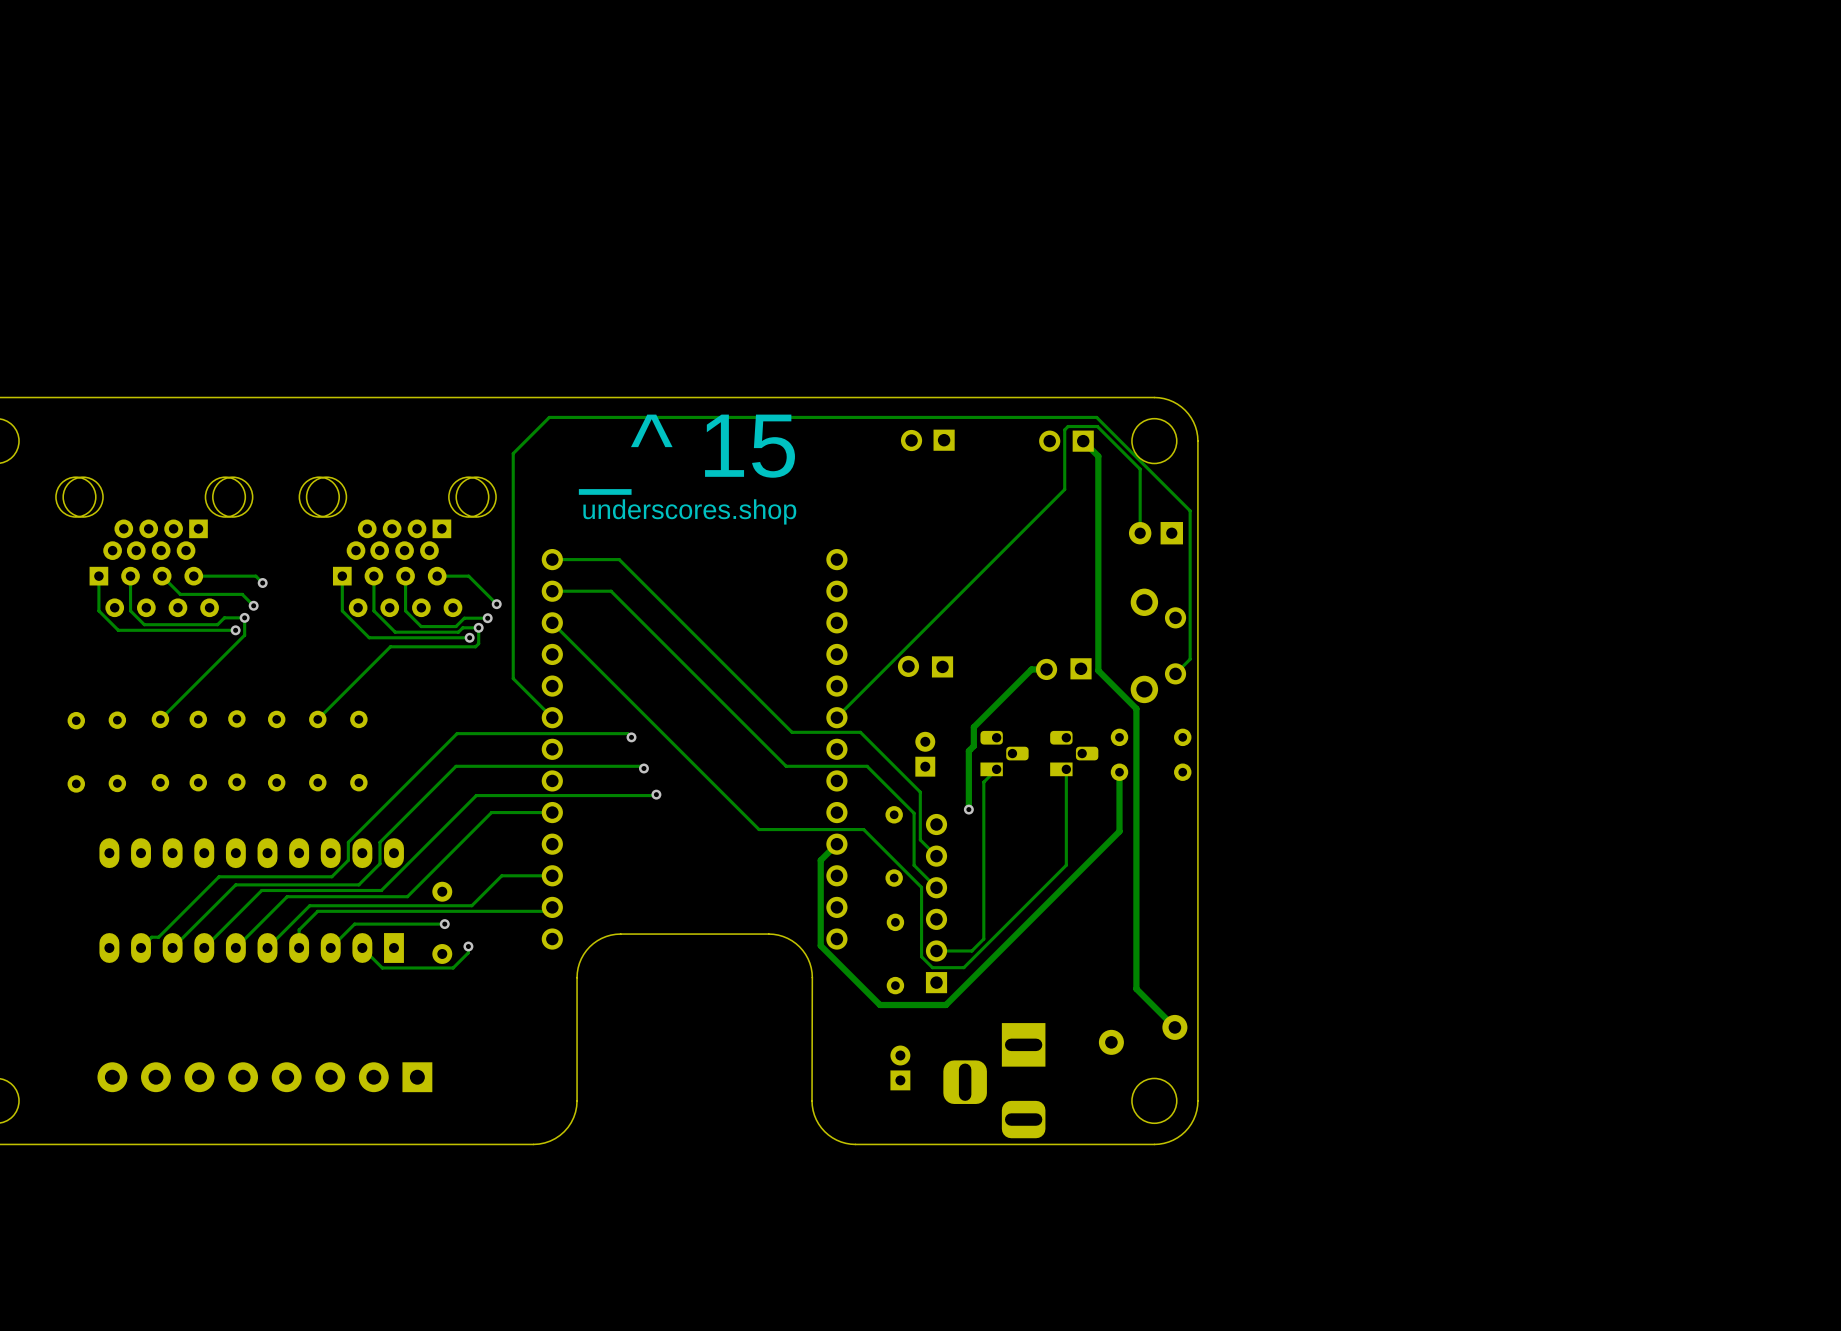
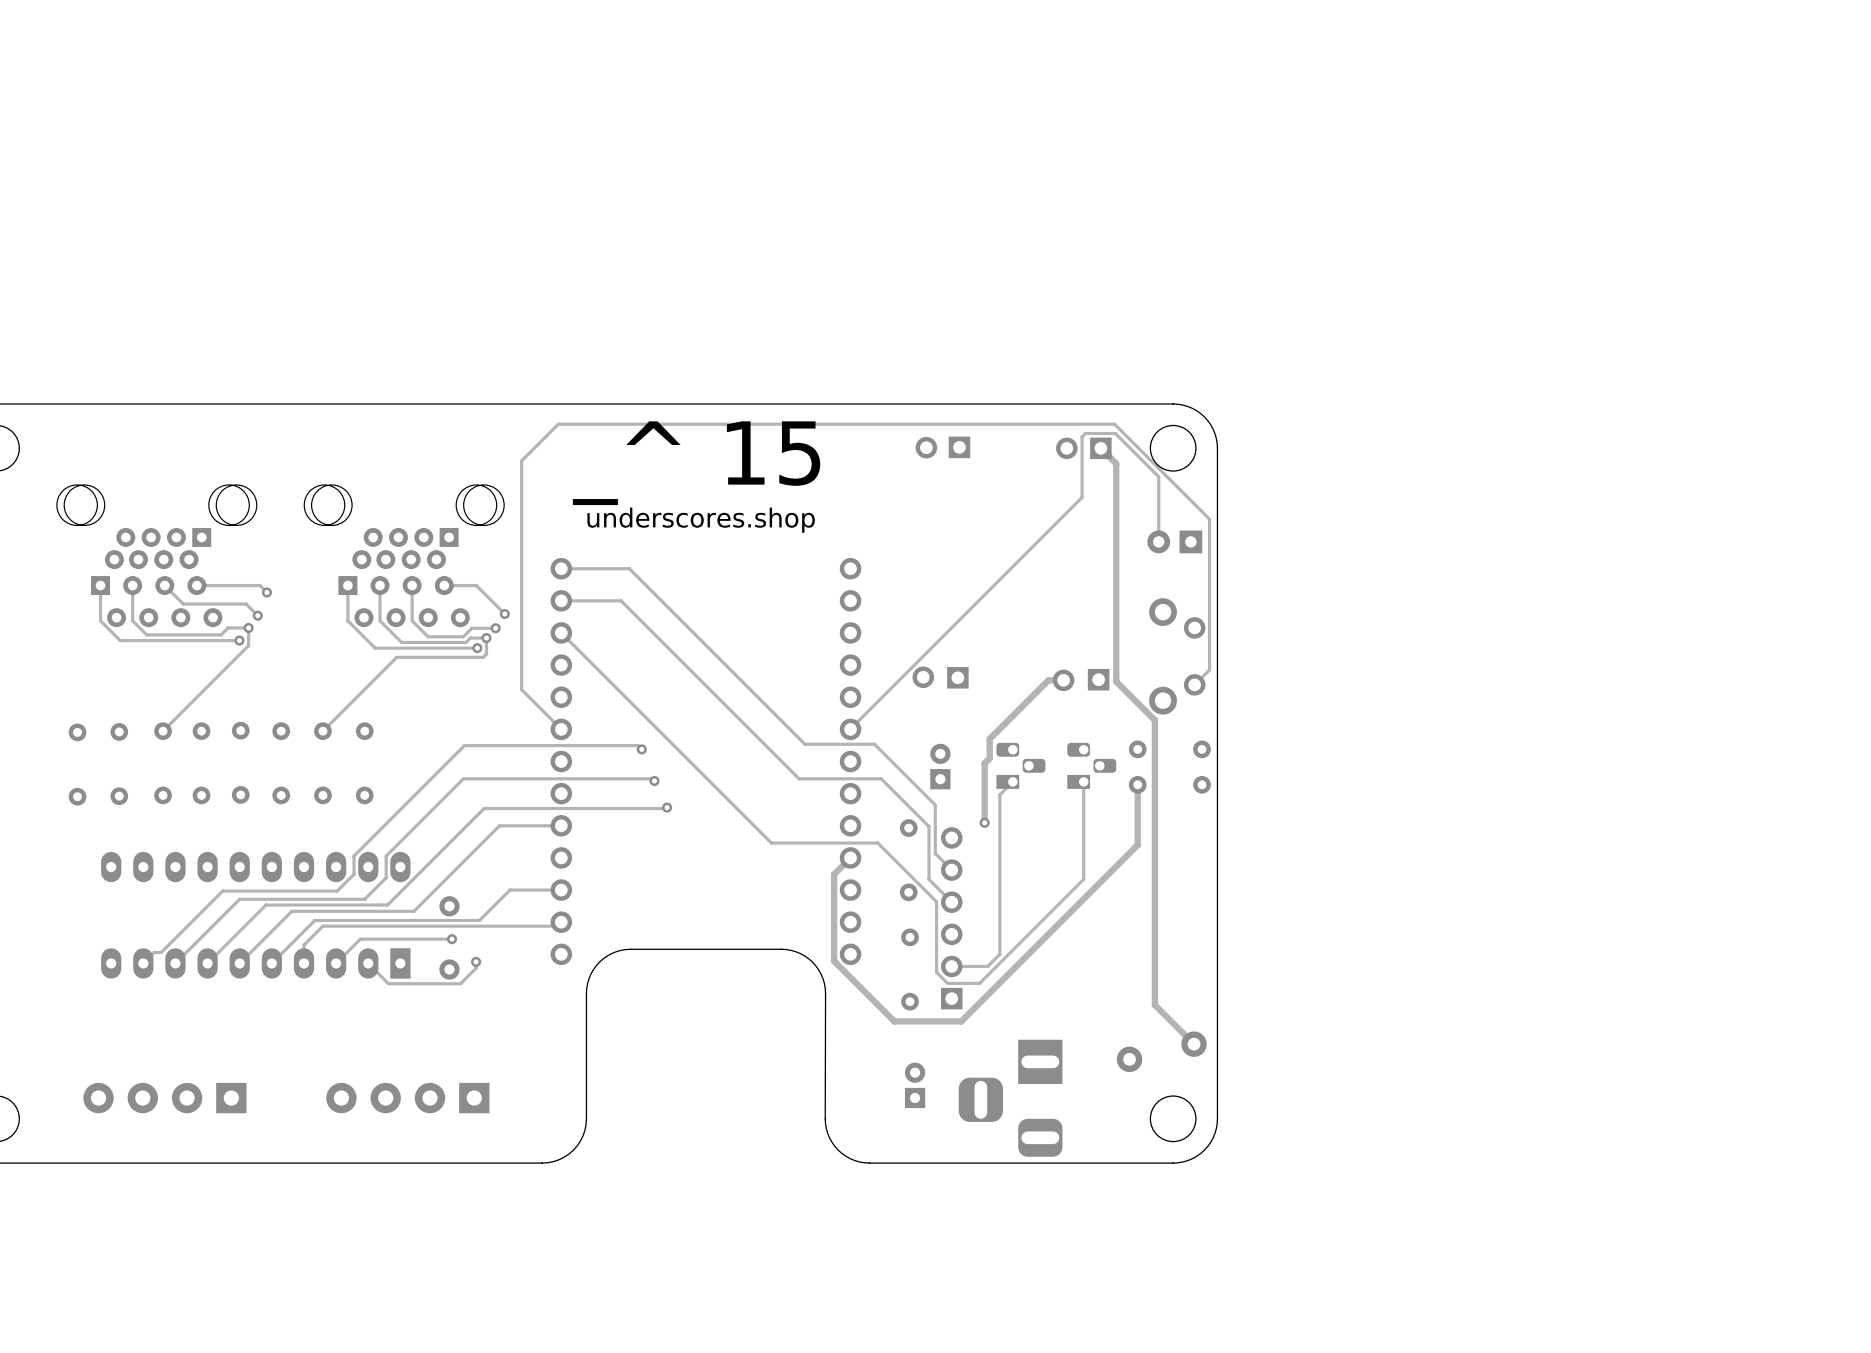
part: (264, 1077) -> none
part: none -> (164, 1098)
part: none -> (407, 1098)

